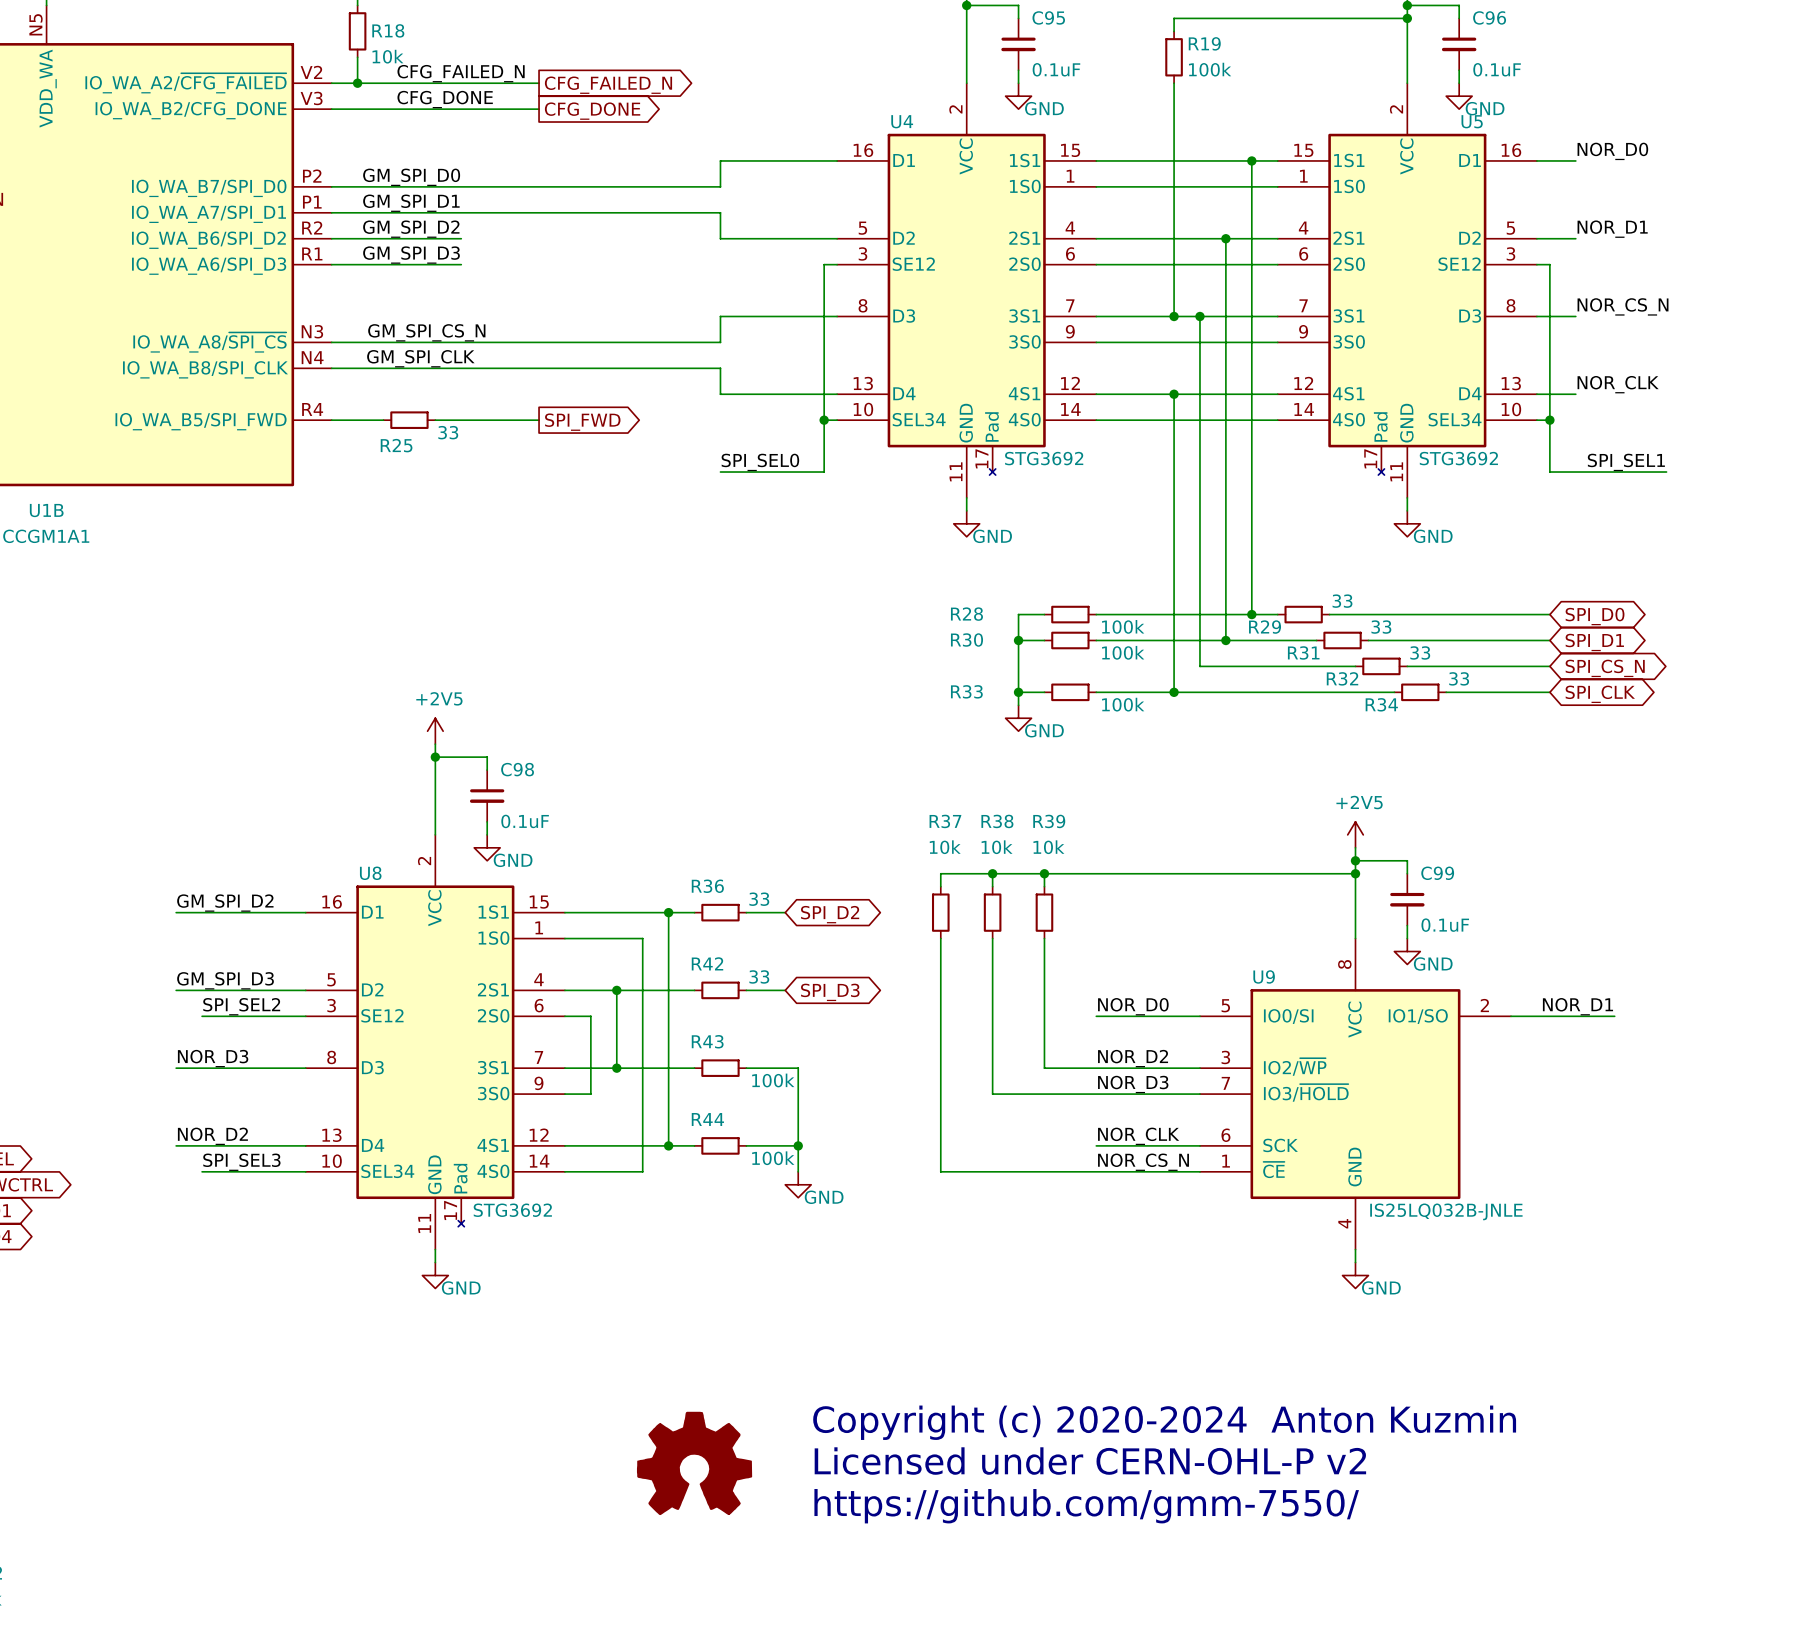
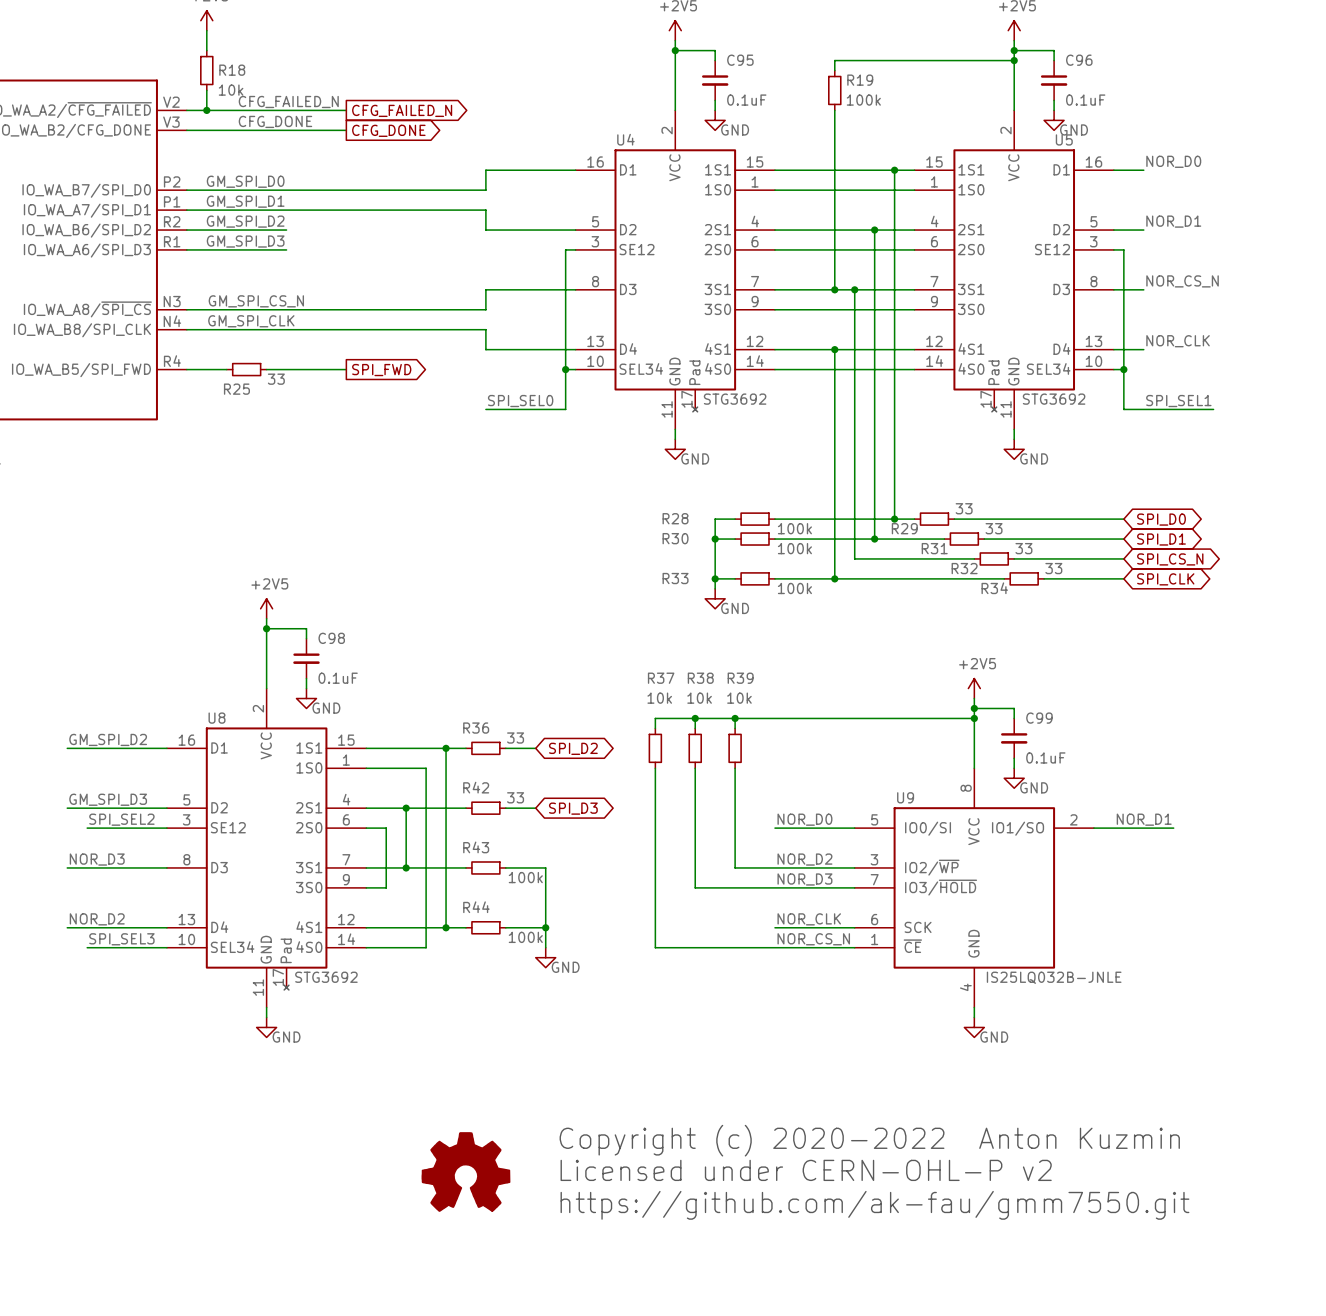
text: Copyright (c) 2020-2024 Anton Kuzmin (1164, 1422) -> Copyright (c) 2020-2022 Anton Kuzmin (869, 1140)
text: https://github.com/gmm-7550/ (1086, 1506) -> https://github.com/ak-fau/gmm7550.git (874, 1205)

